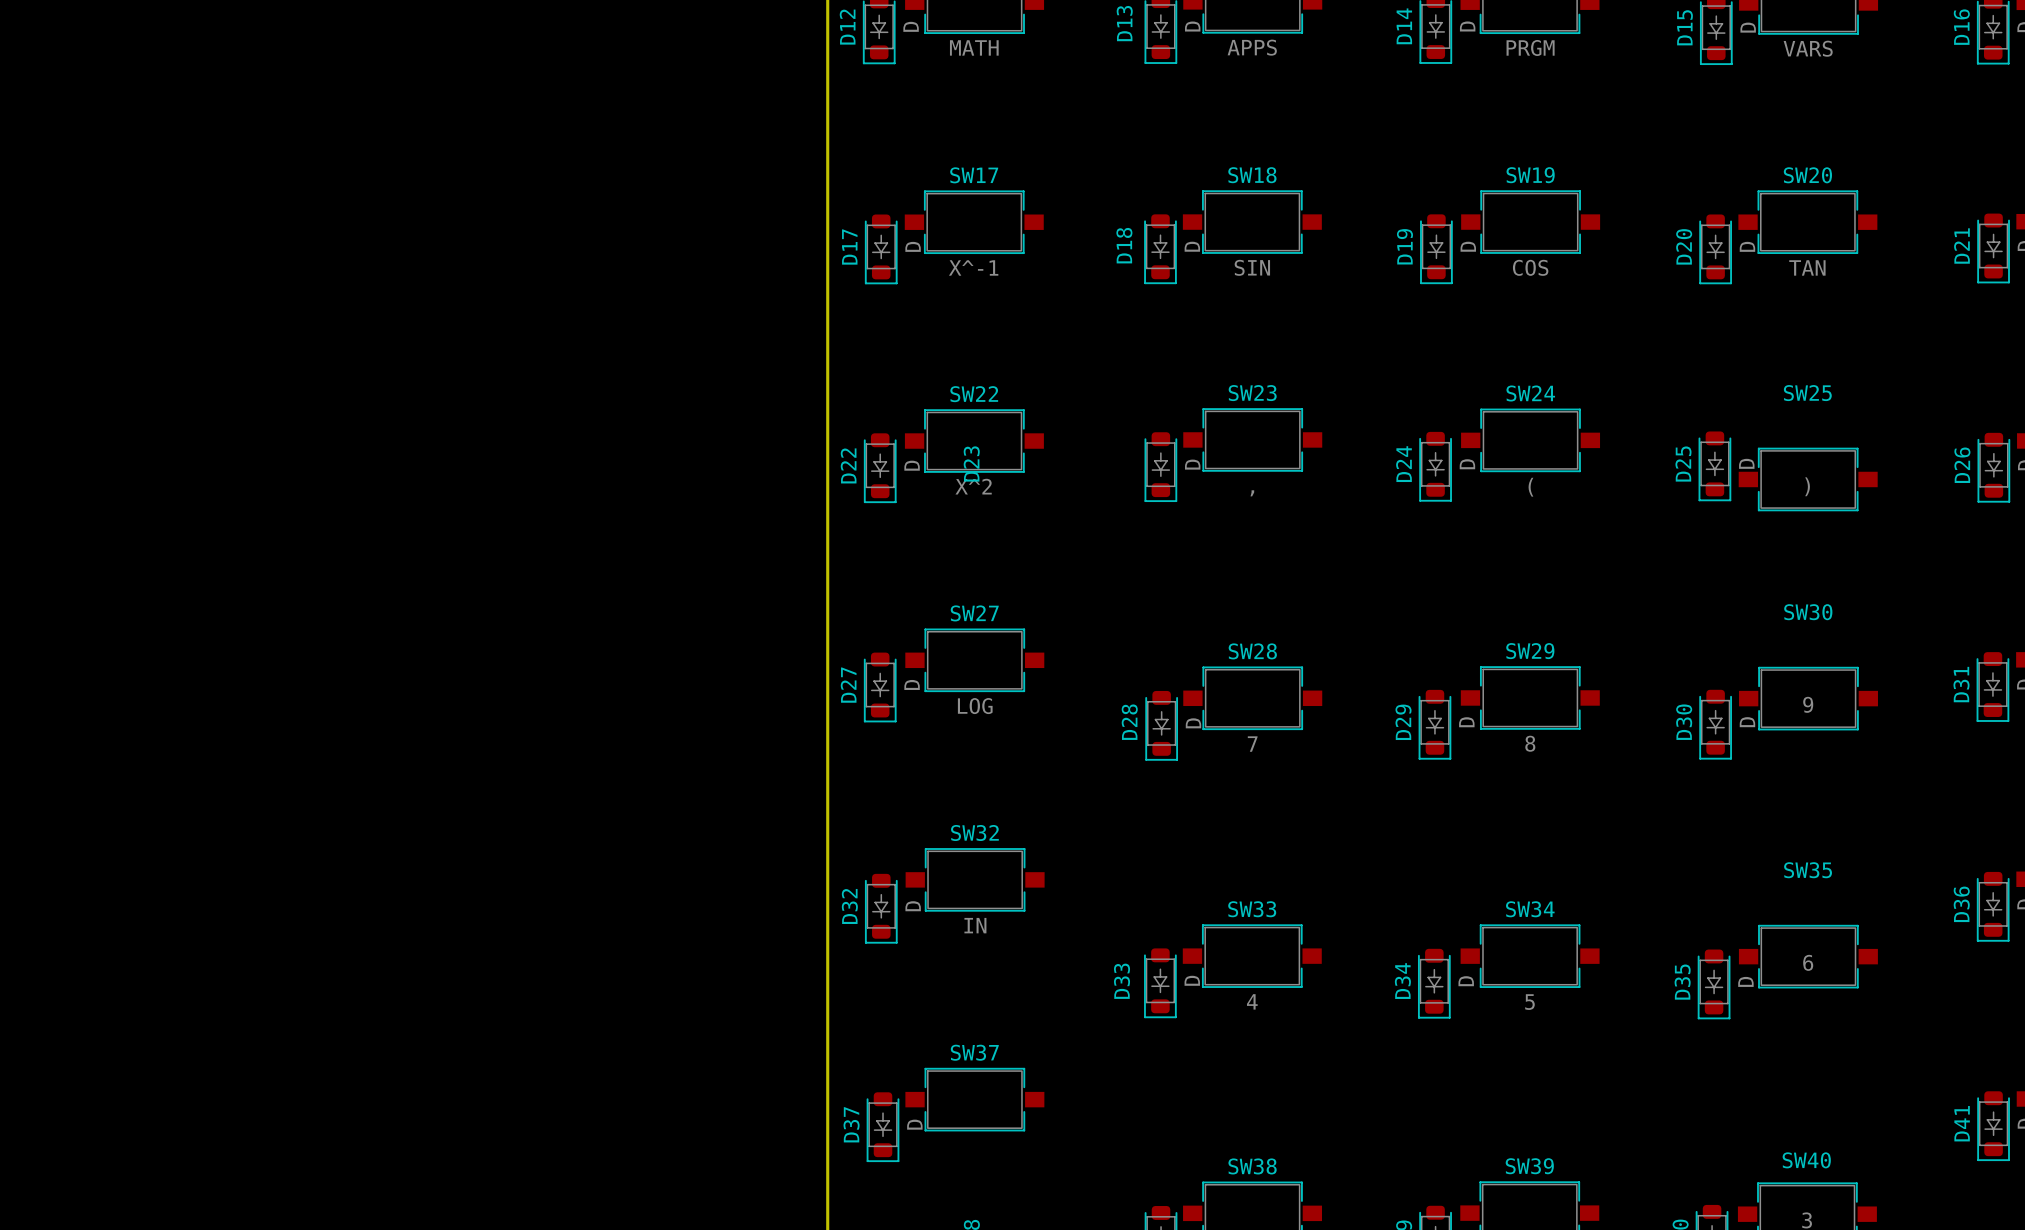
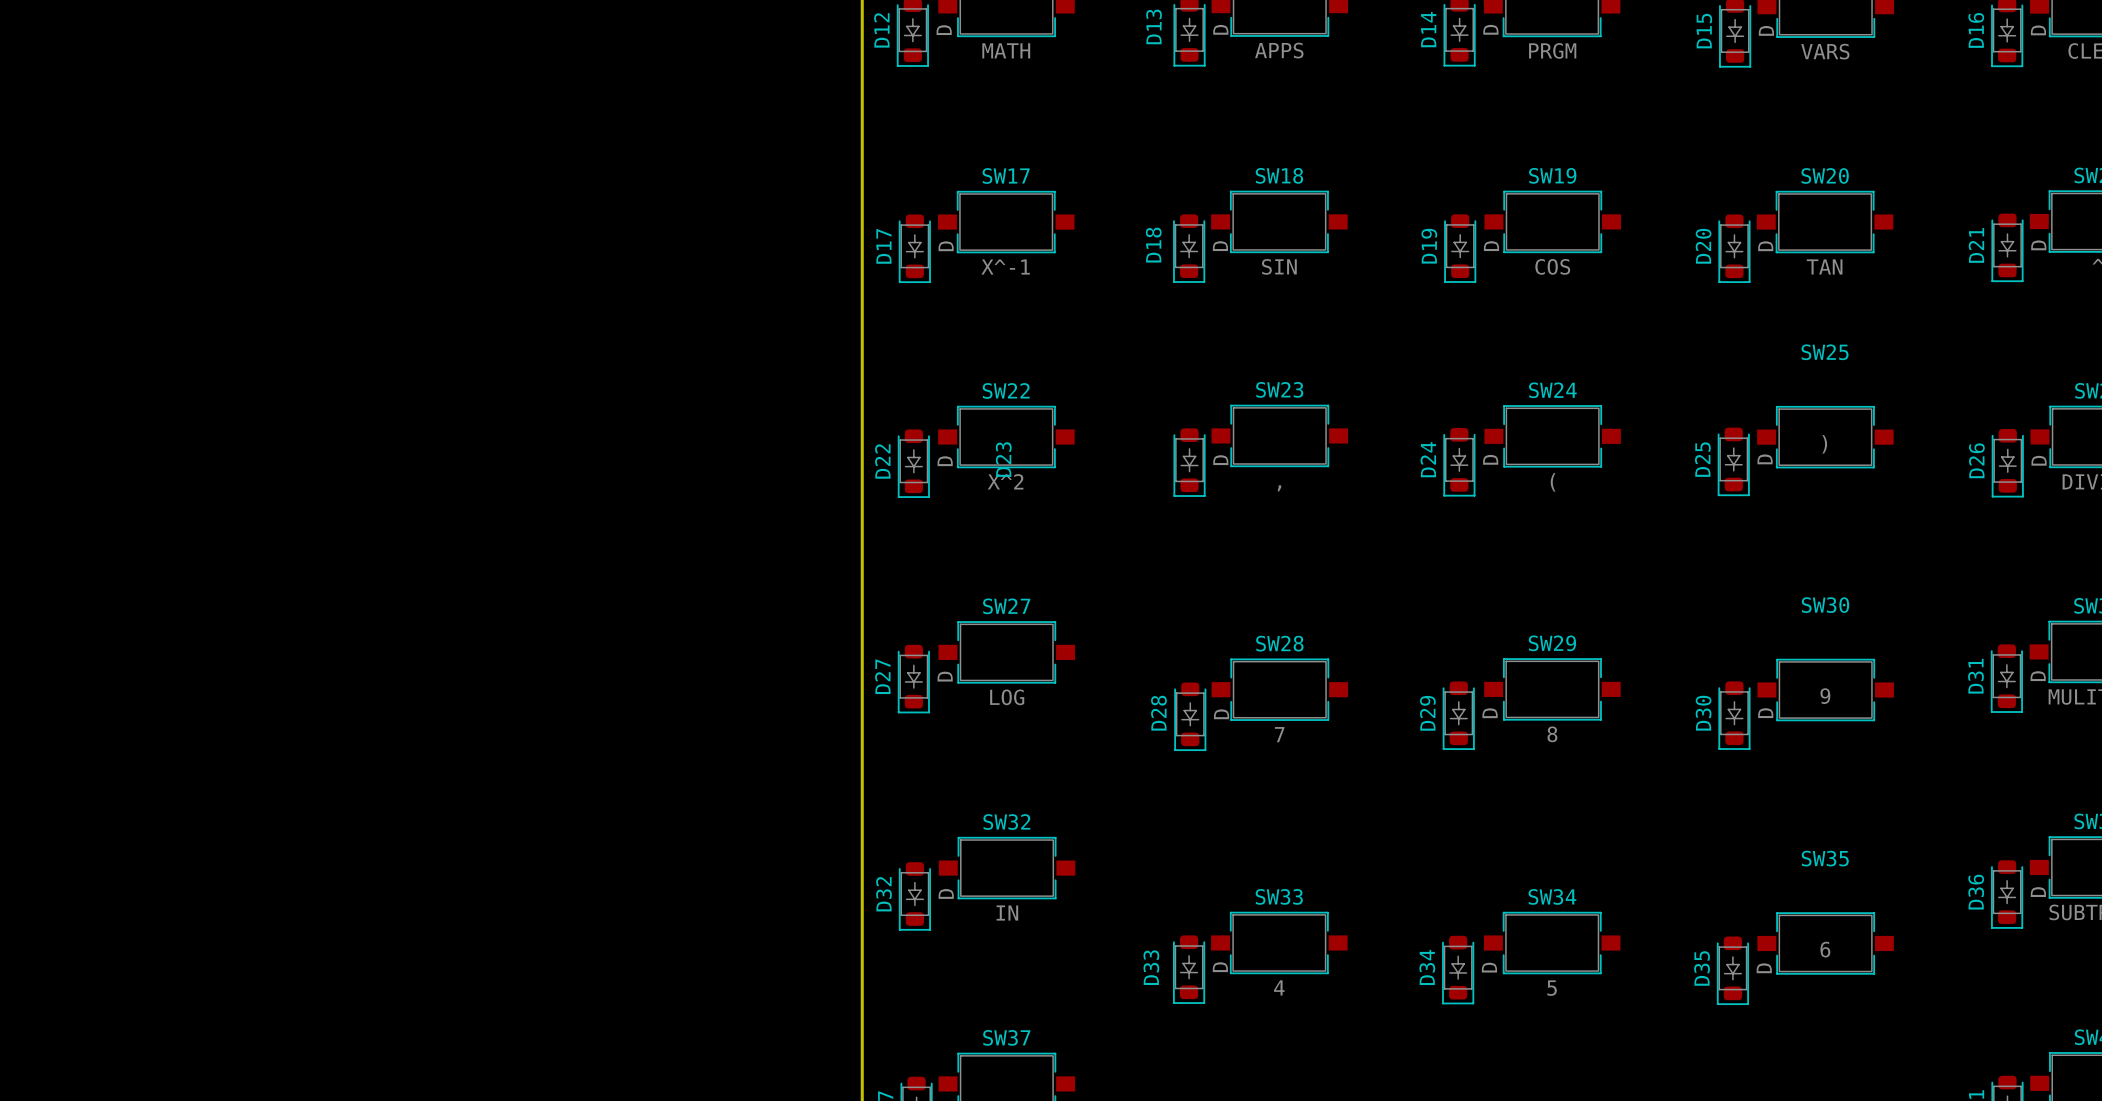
SW25 position: (1808, 479) -> (1825, 437)

